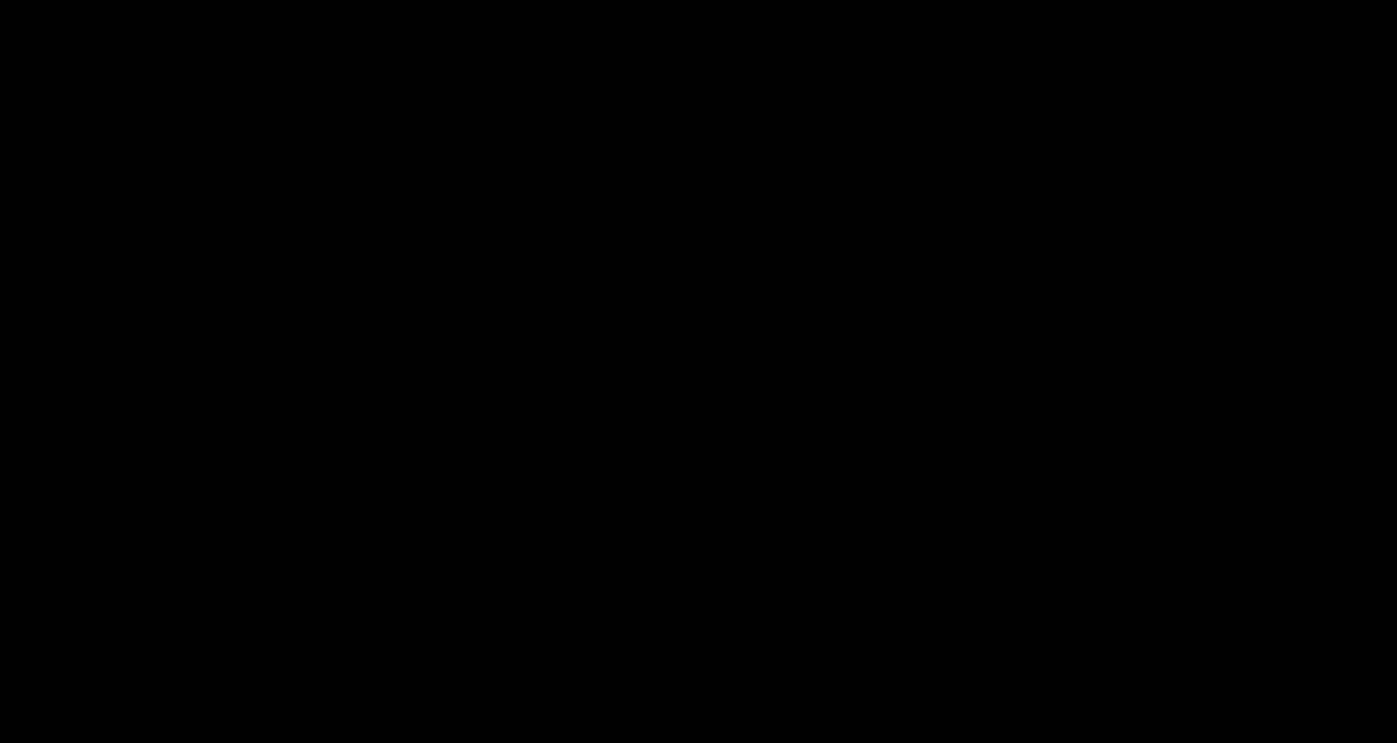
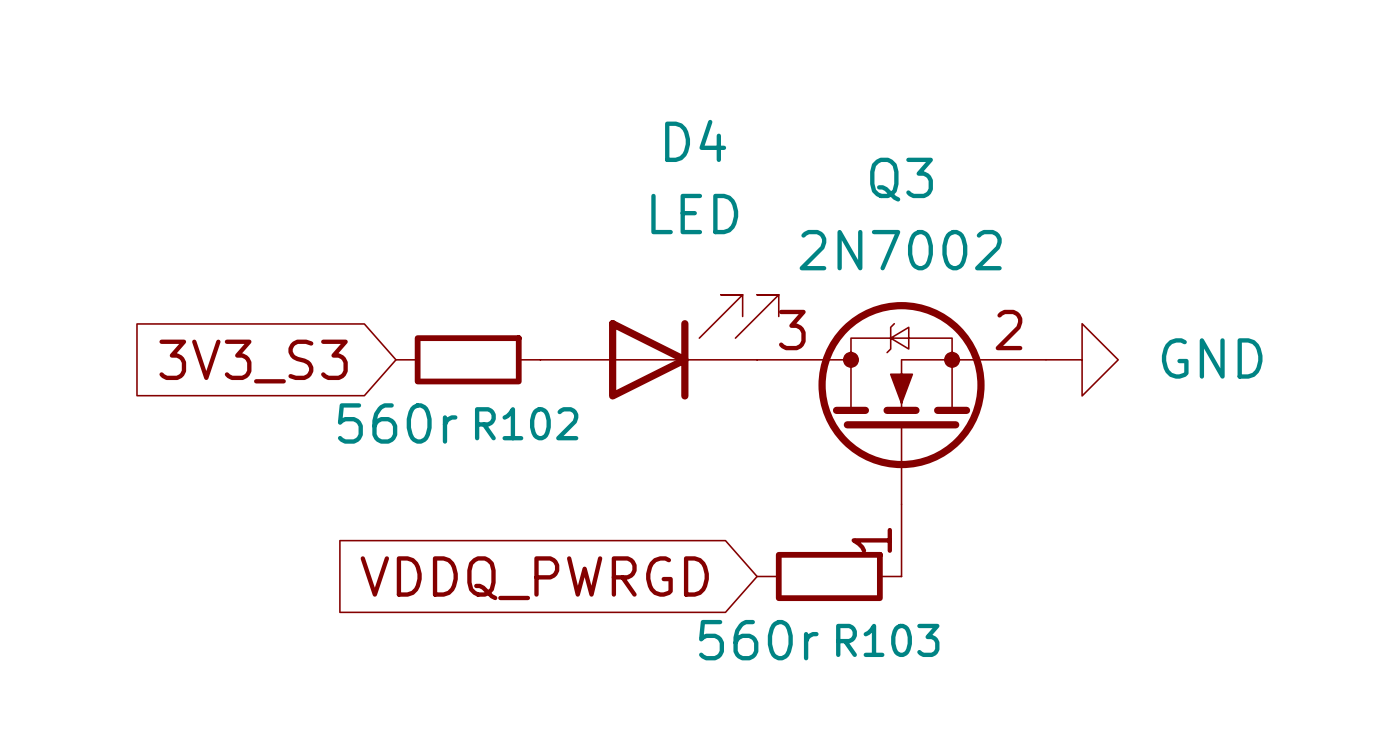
D4: none -> LED (659, 347)
R102: none -> 560r (468, 359)
power symbol: none -> GND (1082, 359)
global label: none -> 3V3_S3 (253, 361)
Q3: none -> 2N7002 (901, 439)
R103: none -> 560r (829, 576)
global label: none -> VDDQ_PWRGD (534, 578)

